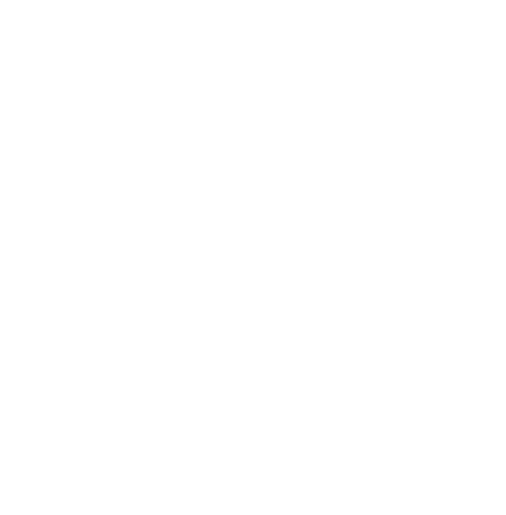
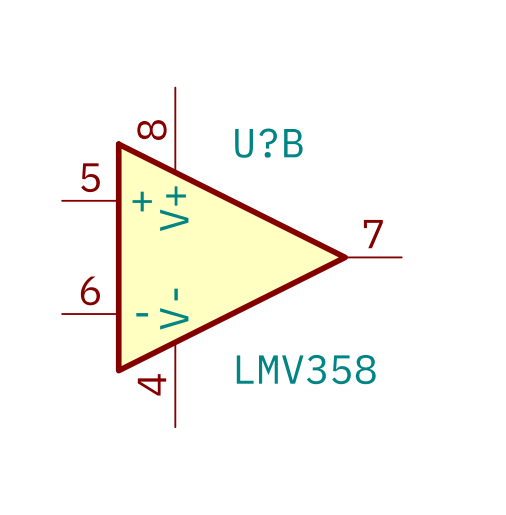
U?B: none -> LMV358 (231, 257)

